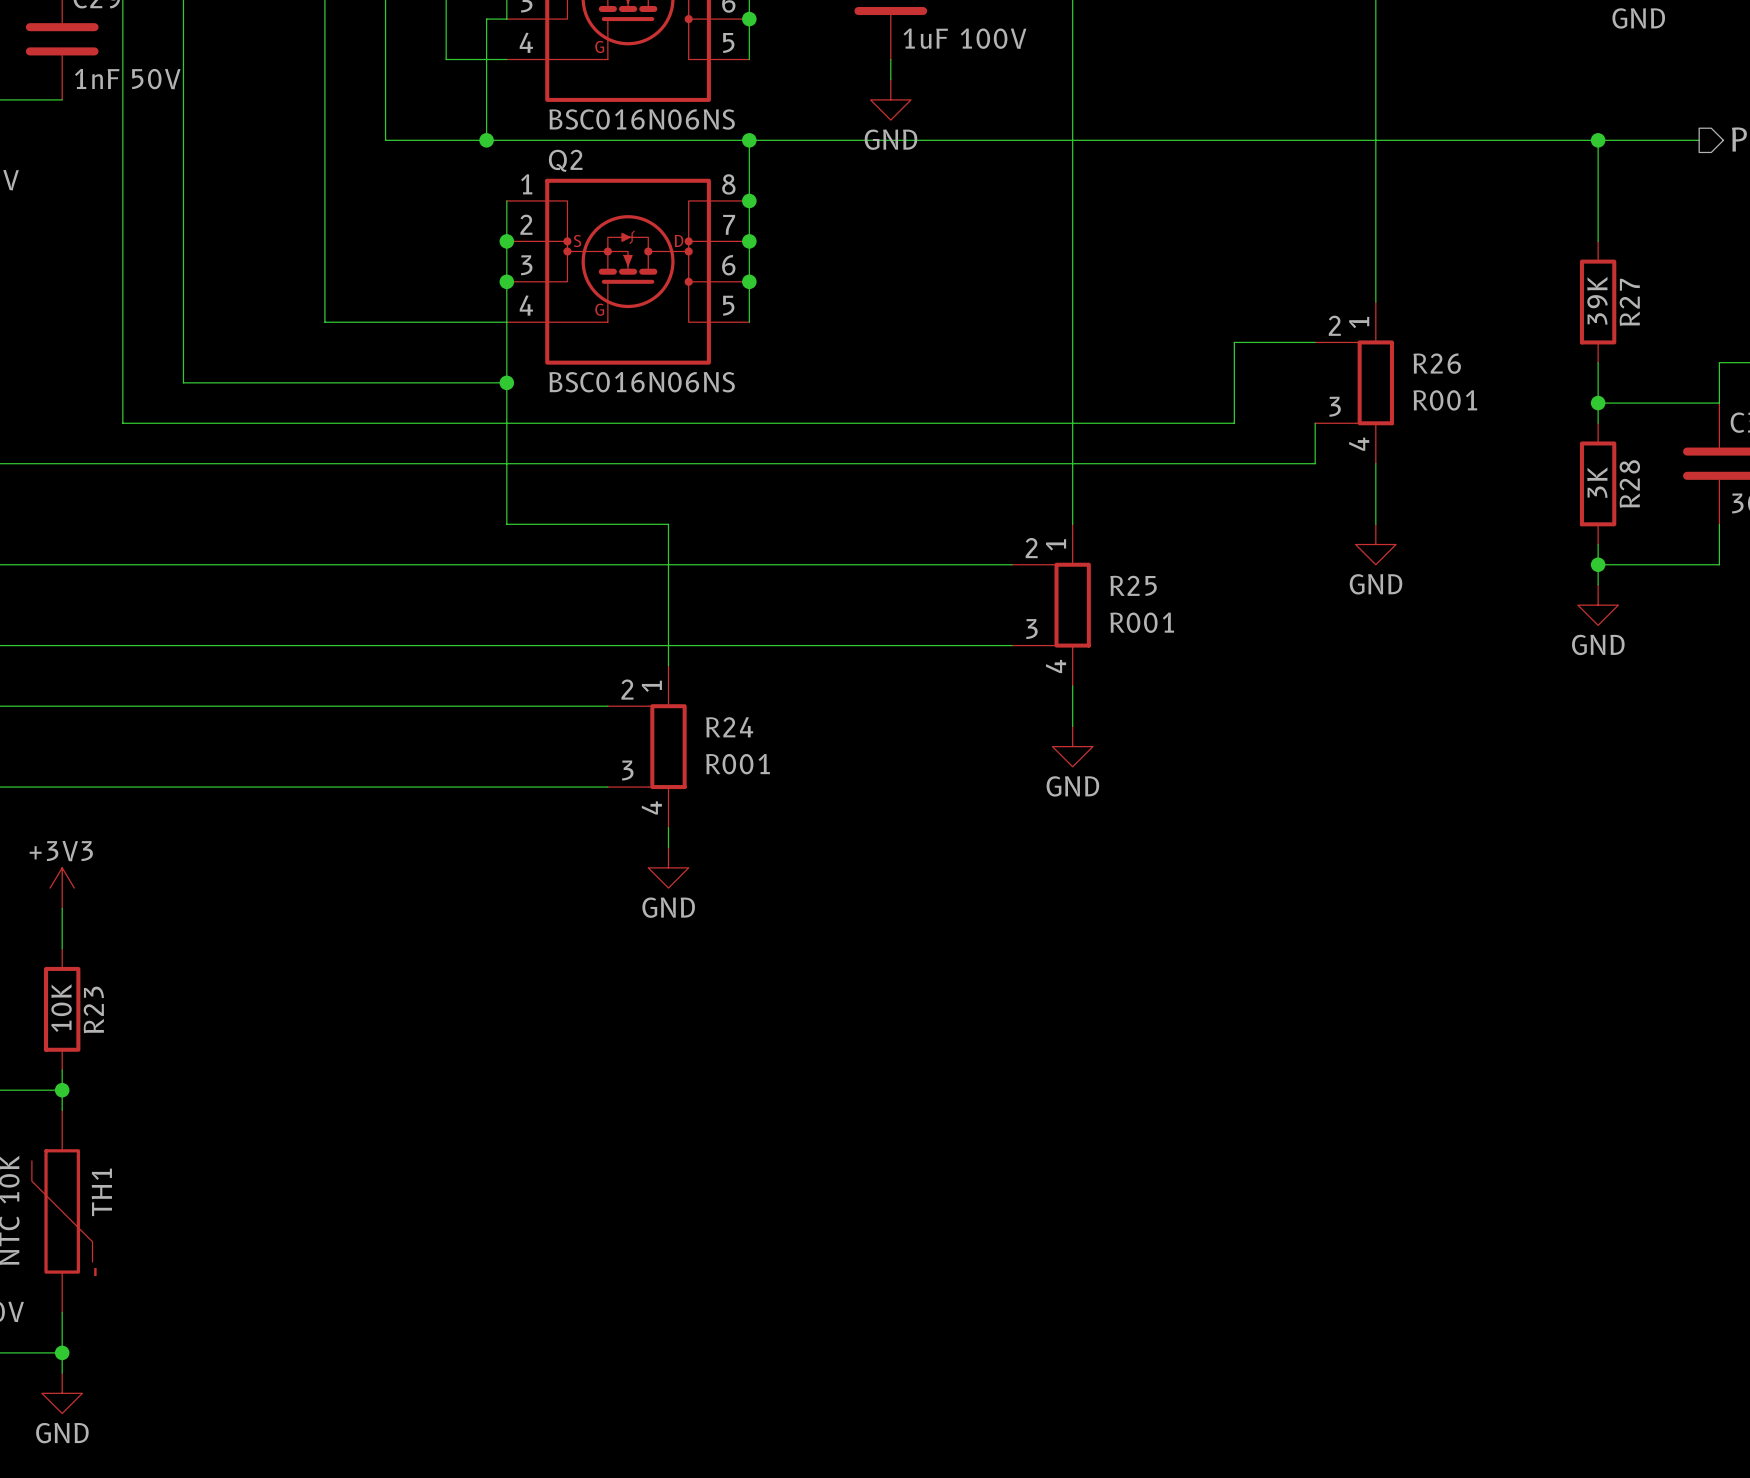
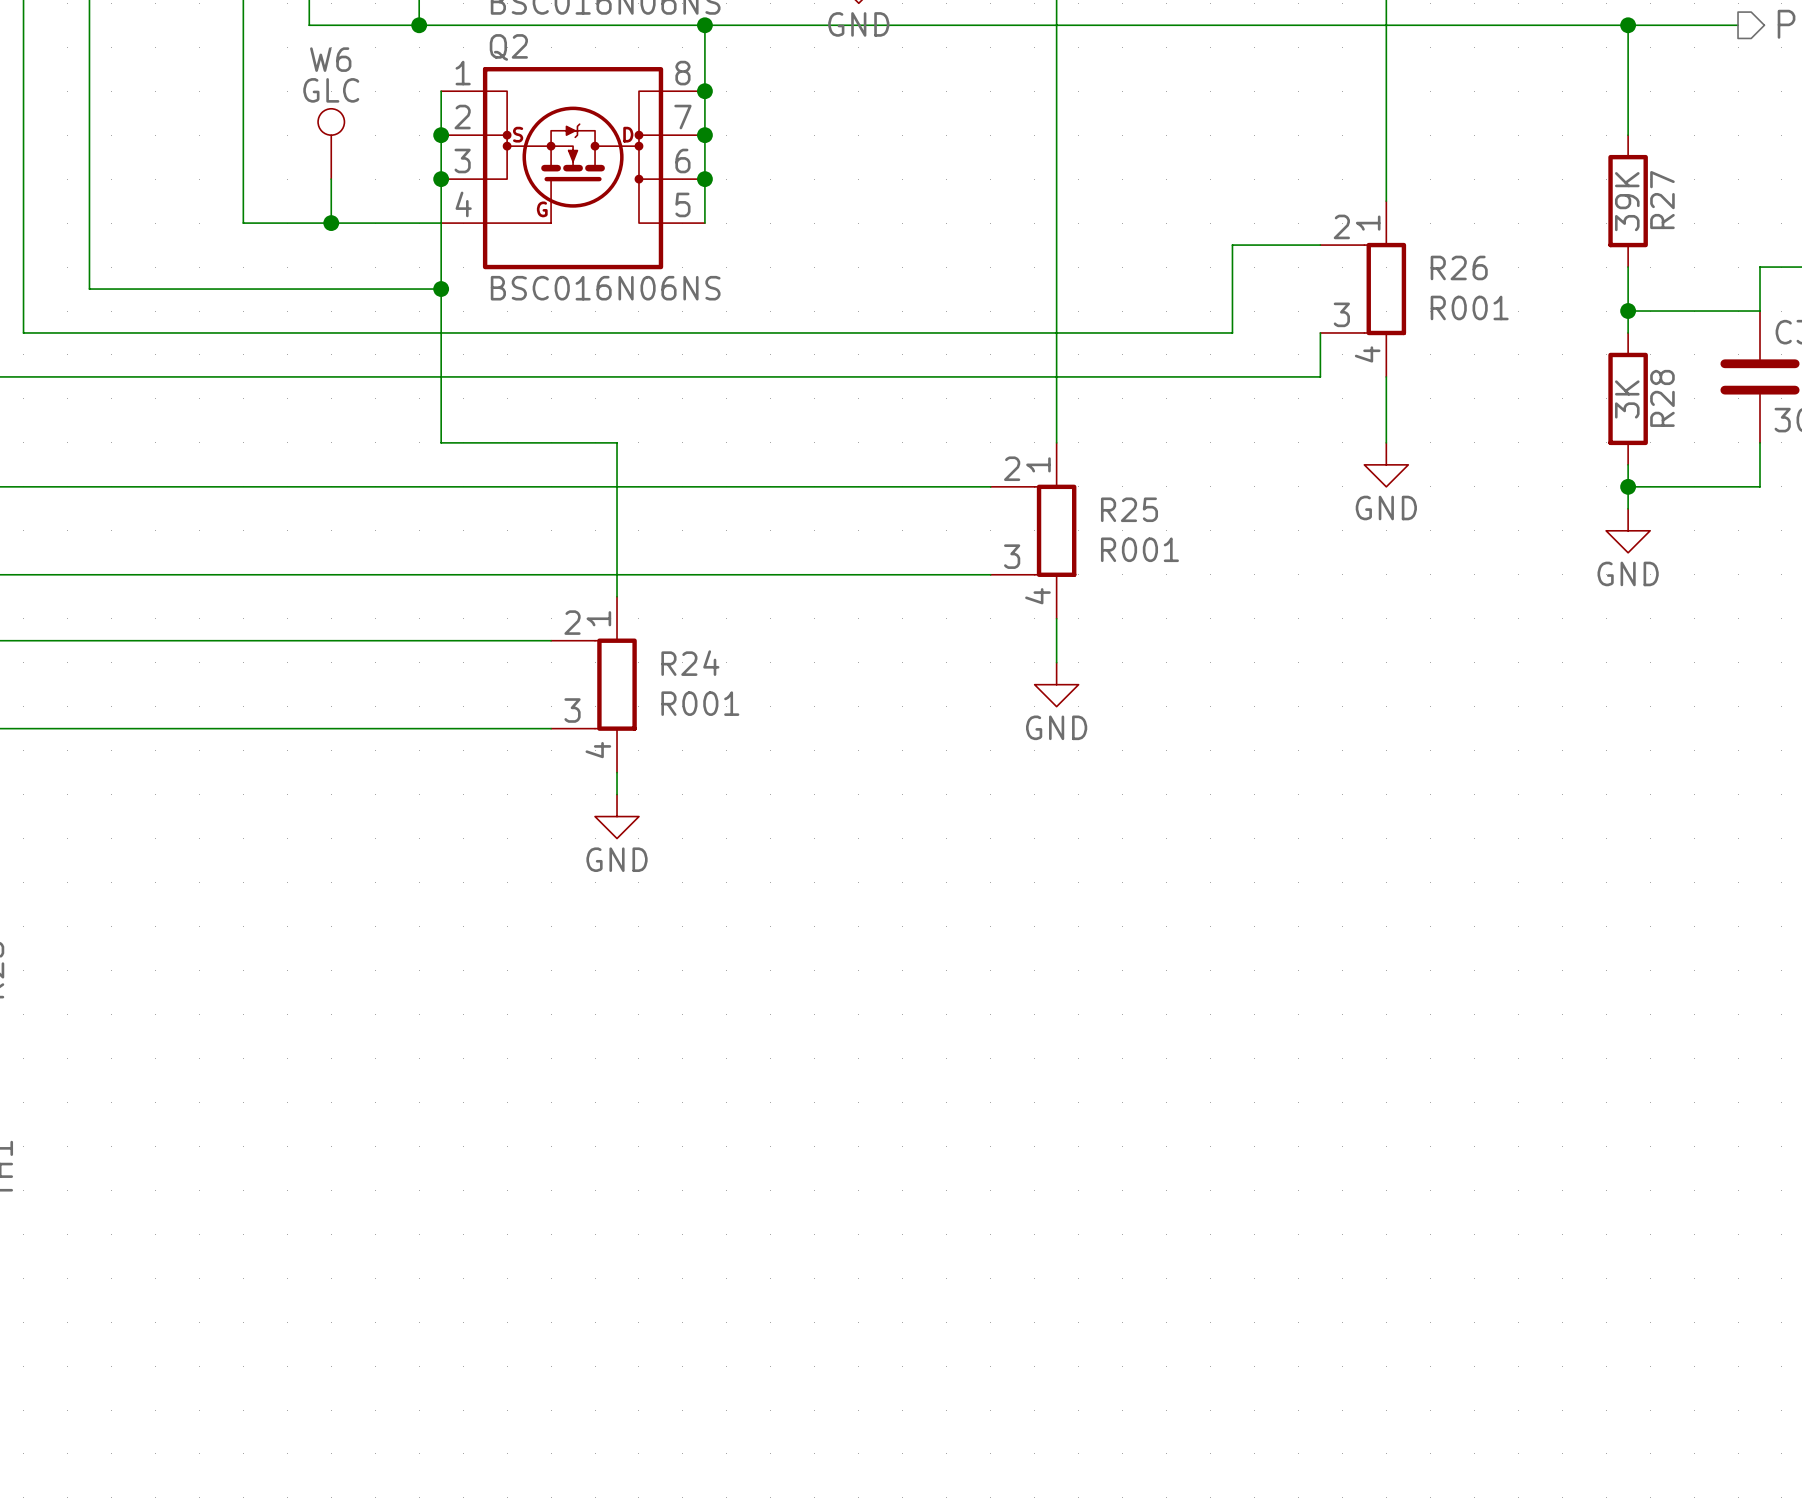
W6: none -> GLC (331, 143)
wire: none -> (331, 179) (331, 223)
junction: none -> (331, 223)

